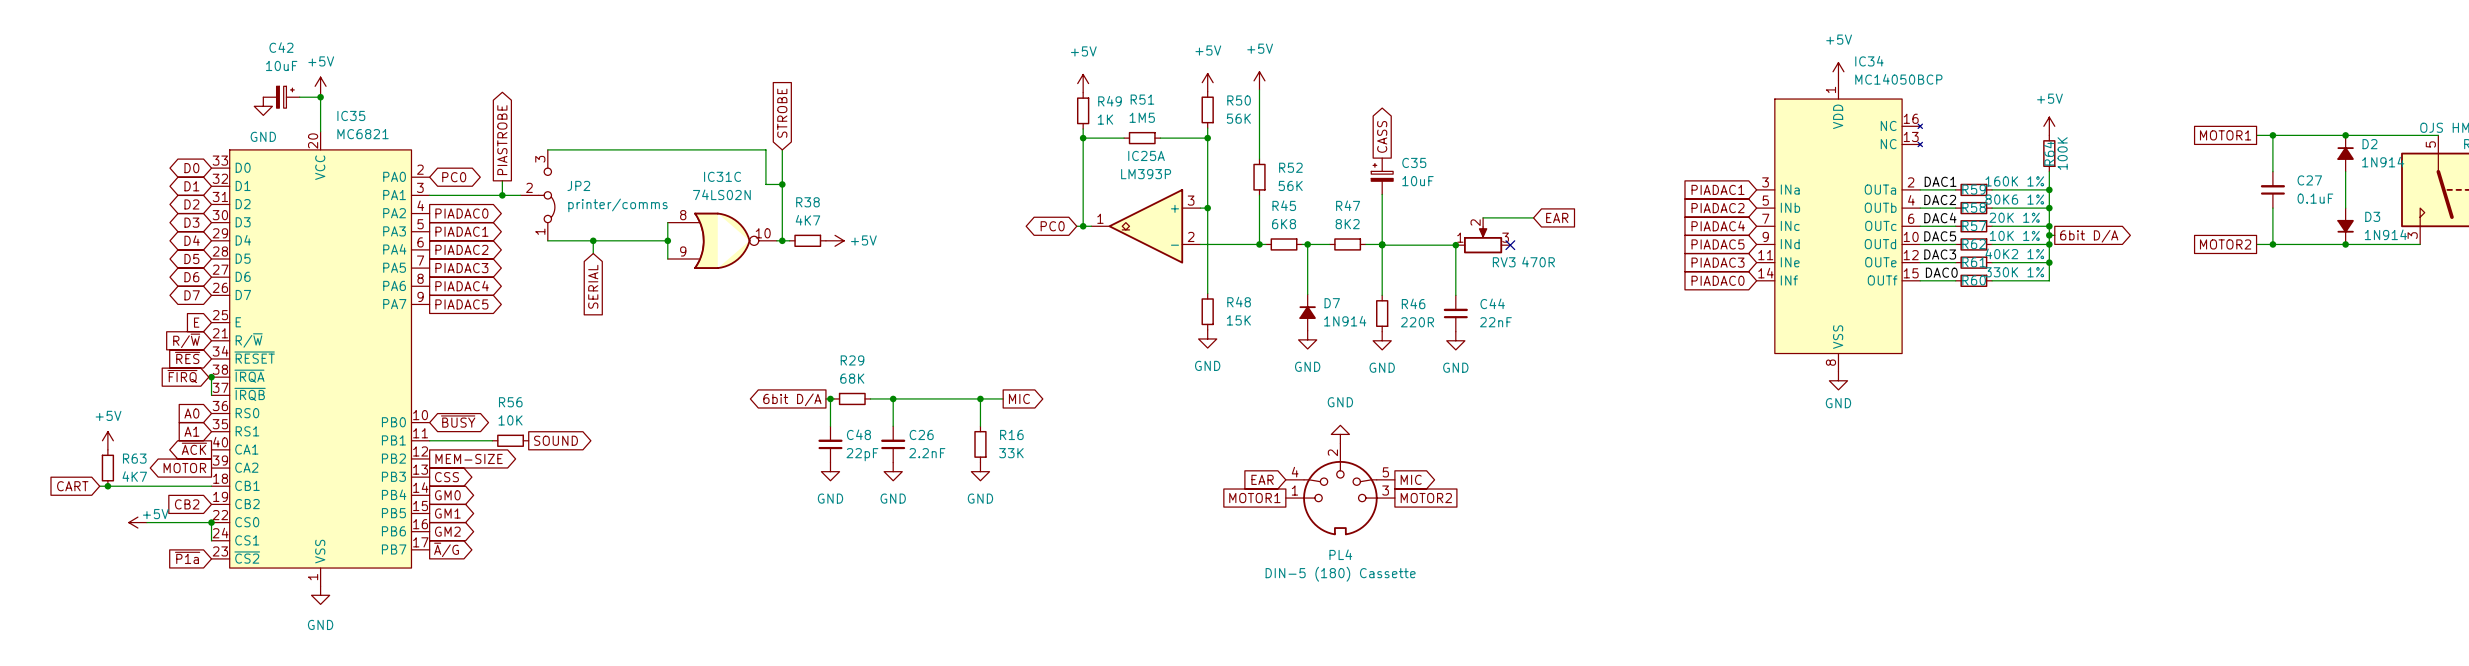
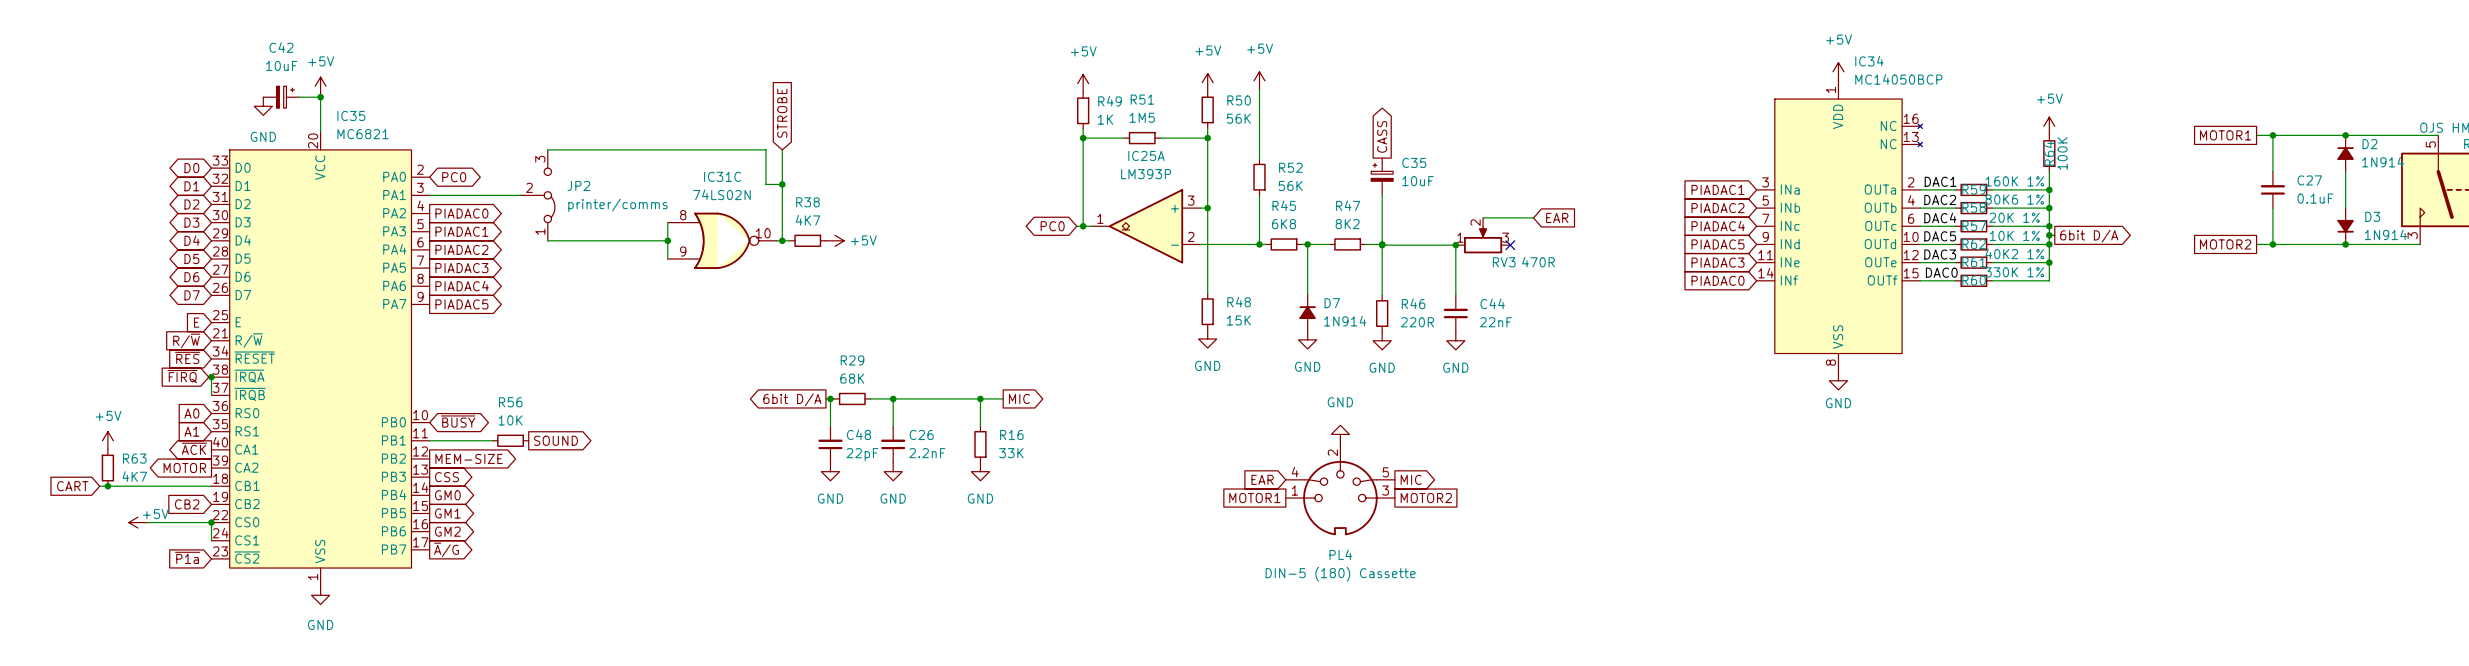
global label: PIASTROBE (502, 140) -> none
wire: (502, 180) (502, 195) -> none
junction: (502, 195) -> none
wire: (593, 240) (593, 253) -> none
junction: (593, 240) -> none
global label: SERIAL (593, 286) -> none

